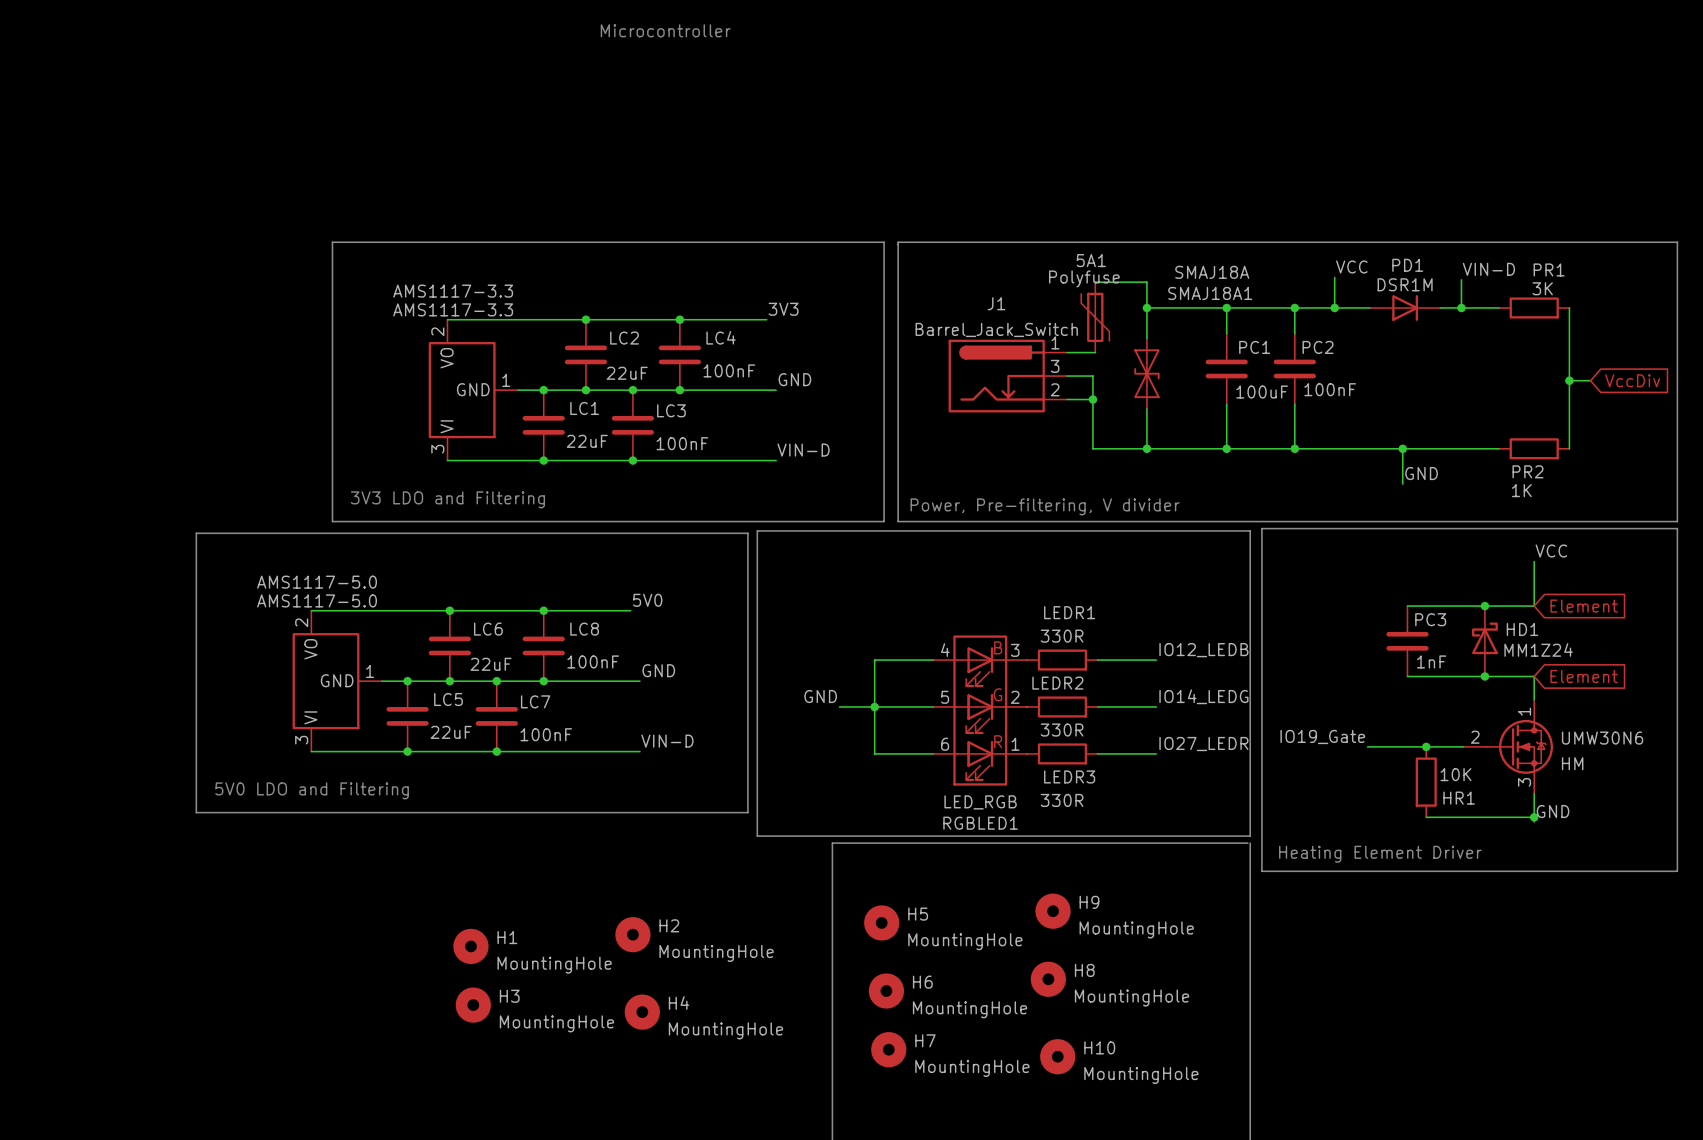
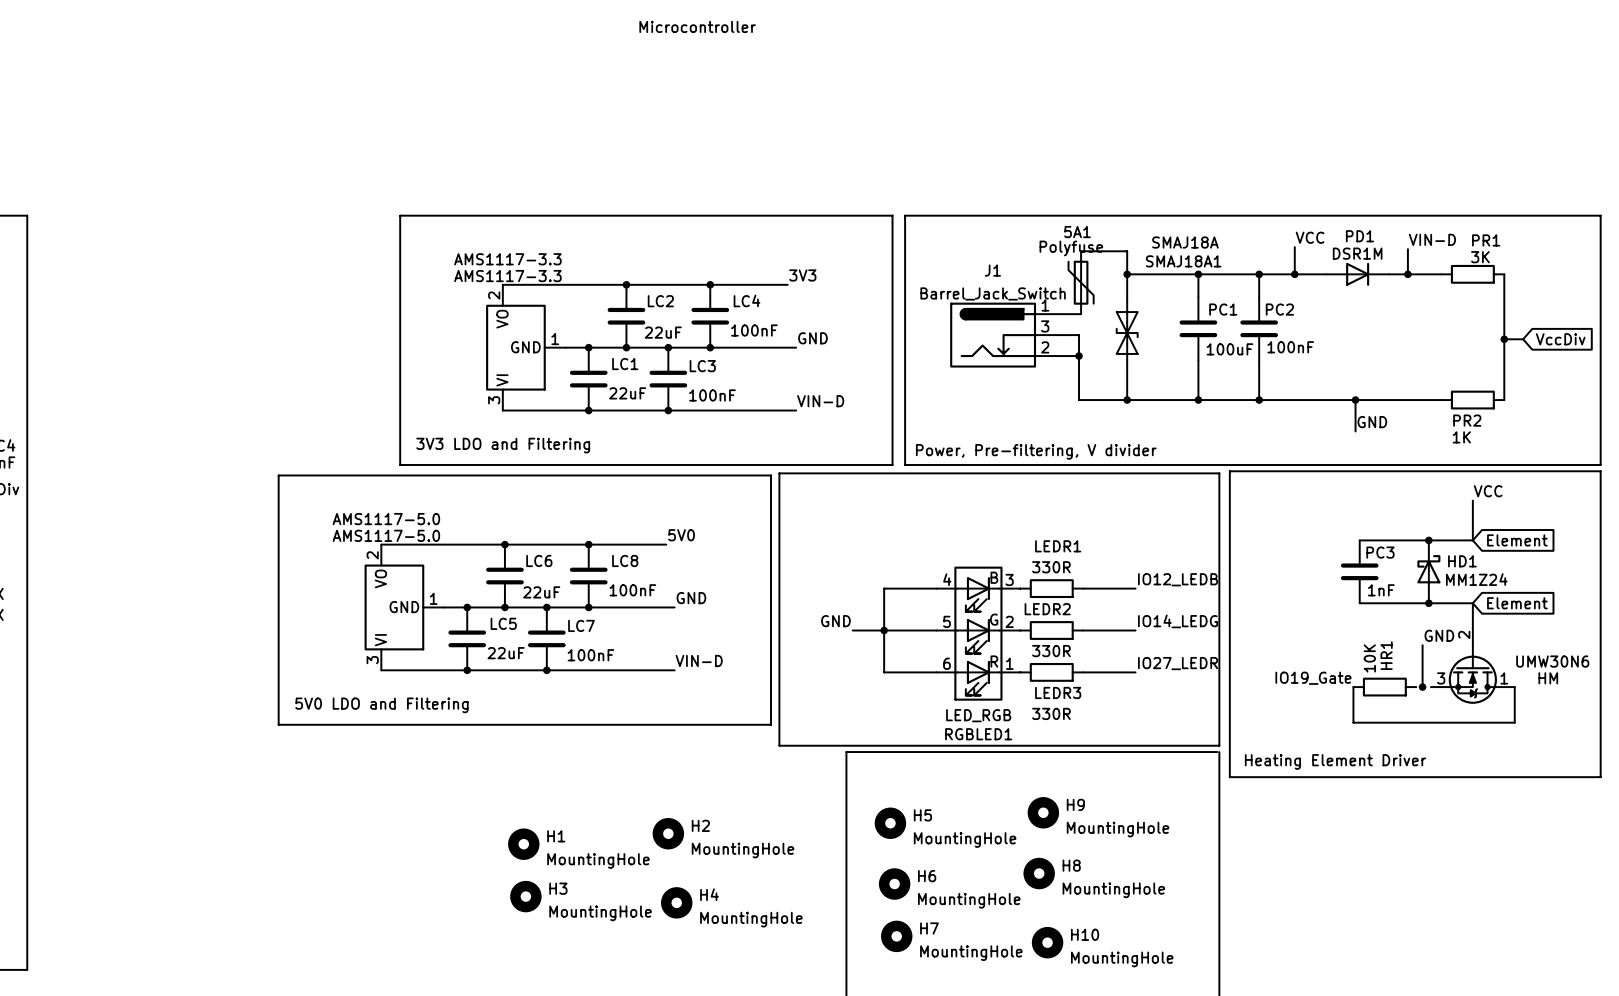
wire: none -> (1422, 645) (1422, 687)
label position: IO19_Gate (1322, 736) -> IO19_Gate (1313, 678)
wire: (1367, 746) (1463, 746) -> none
junction: (1426, 746) -> none
UMW30N6 rotation: 0° (1520, 746) -> 90° clockwise (1472, 674)
wire: none -> (1353, 687) (1353, 722) (1514, 722) (1514, 687)
junction: none -> (1422, 687)
HR1 value position: 10K (1455, 774) -> 10K (1369, 658)
HR1 rotation: 0° (1426, 782) -> 90° clockwise (1384, 687)
wire: (1534, 793) (1534, 822) -> none
HR1 name position: HR1 (1459, 798) -> HR1 (1386, 655)
label position: GND (1553, 811) -> GND (1439, 635)
wire: (1426, 817) (1534, 817) -> none
junction: (1534, 817) -> none

